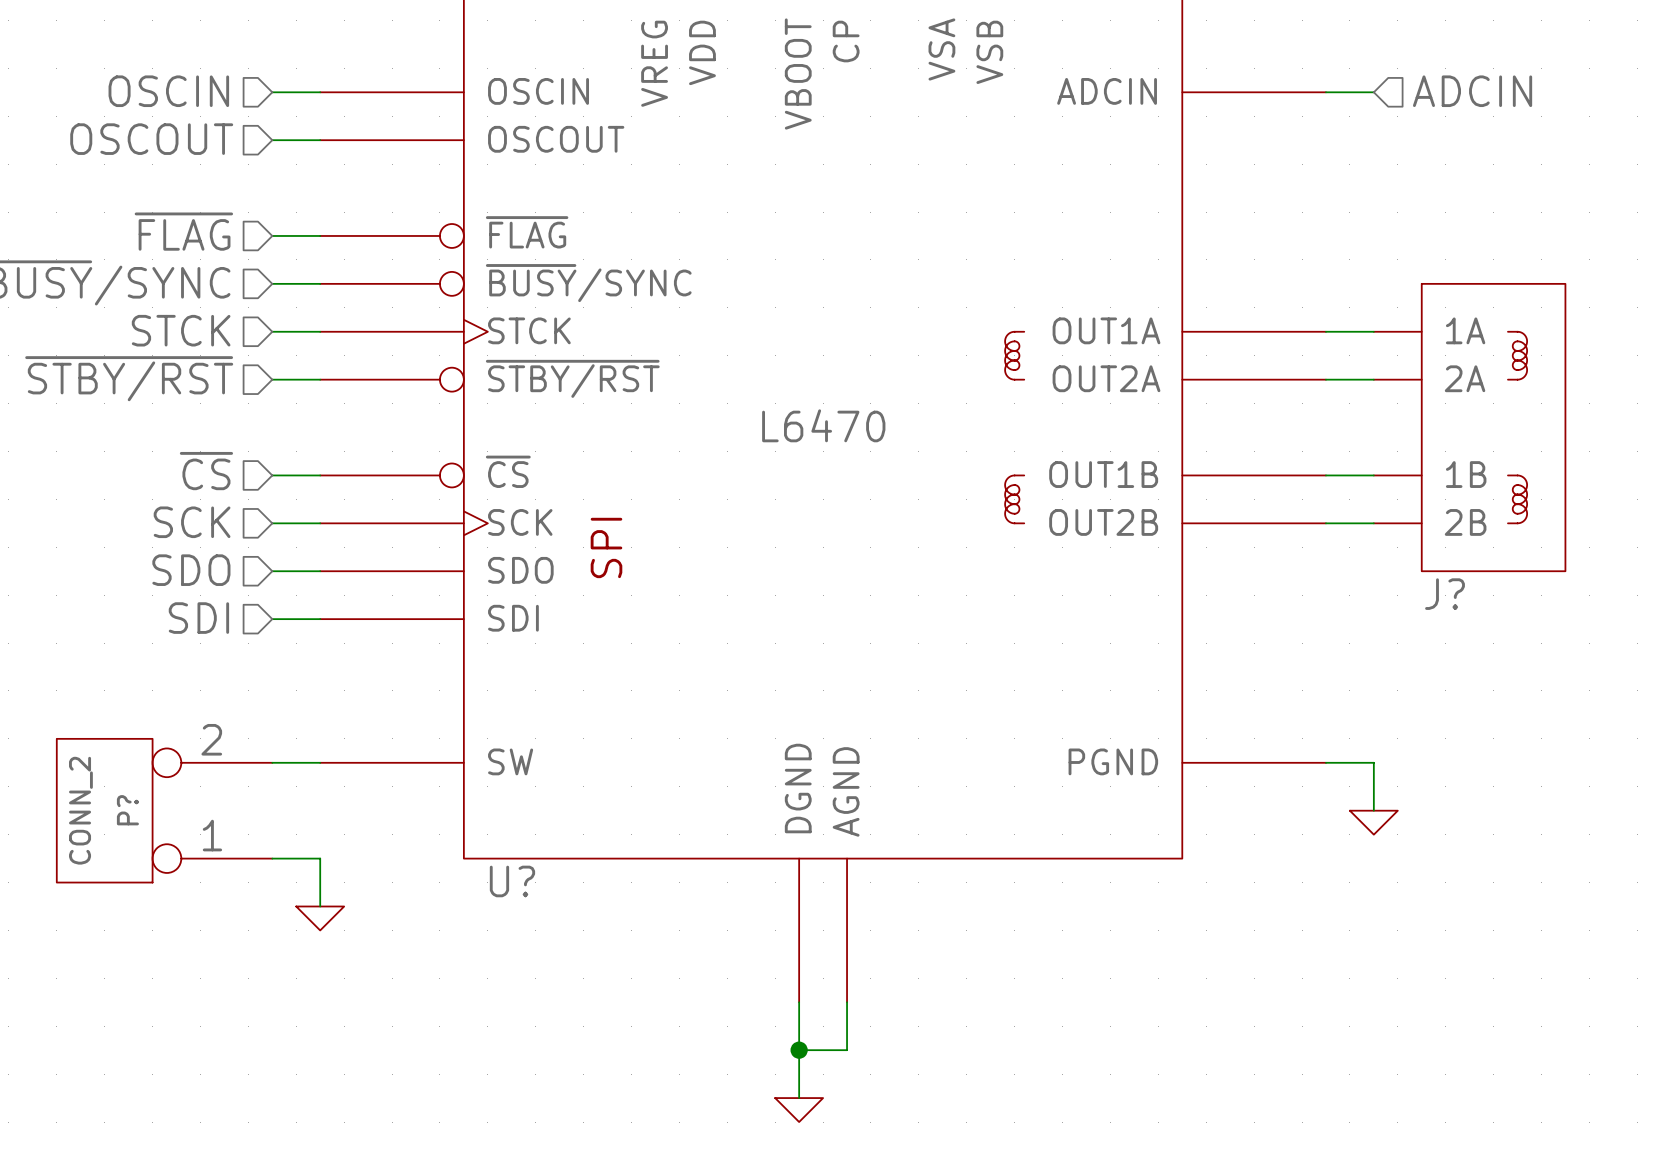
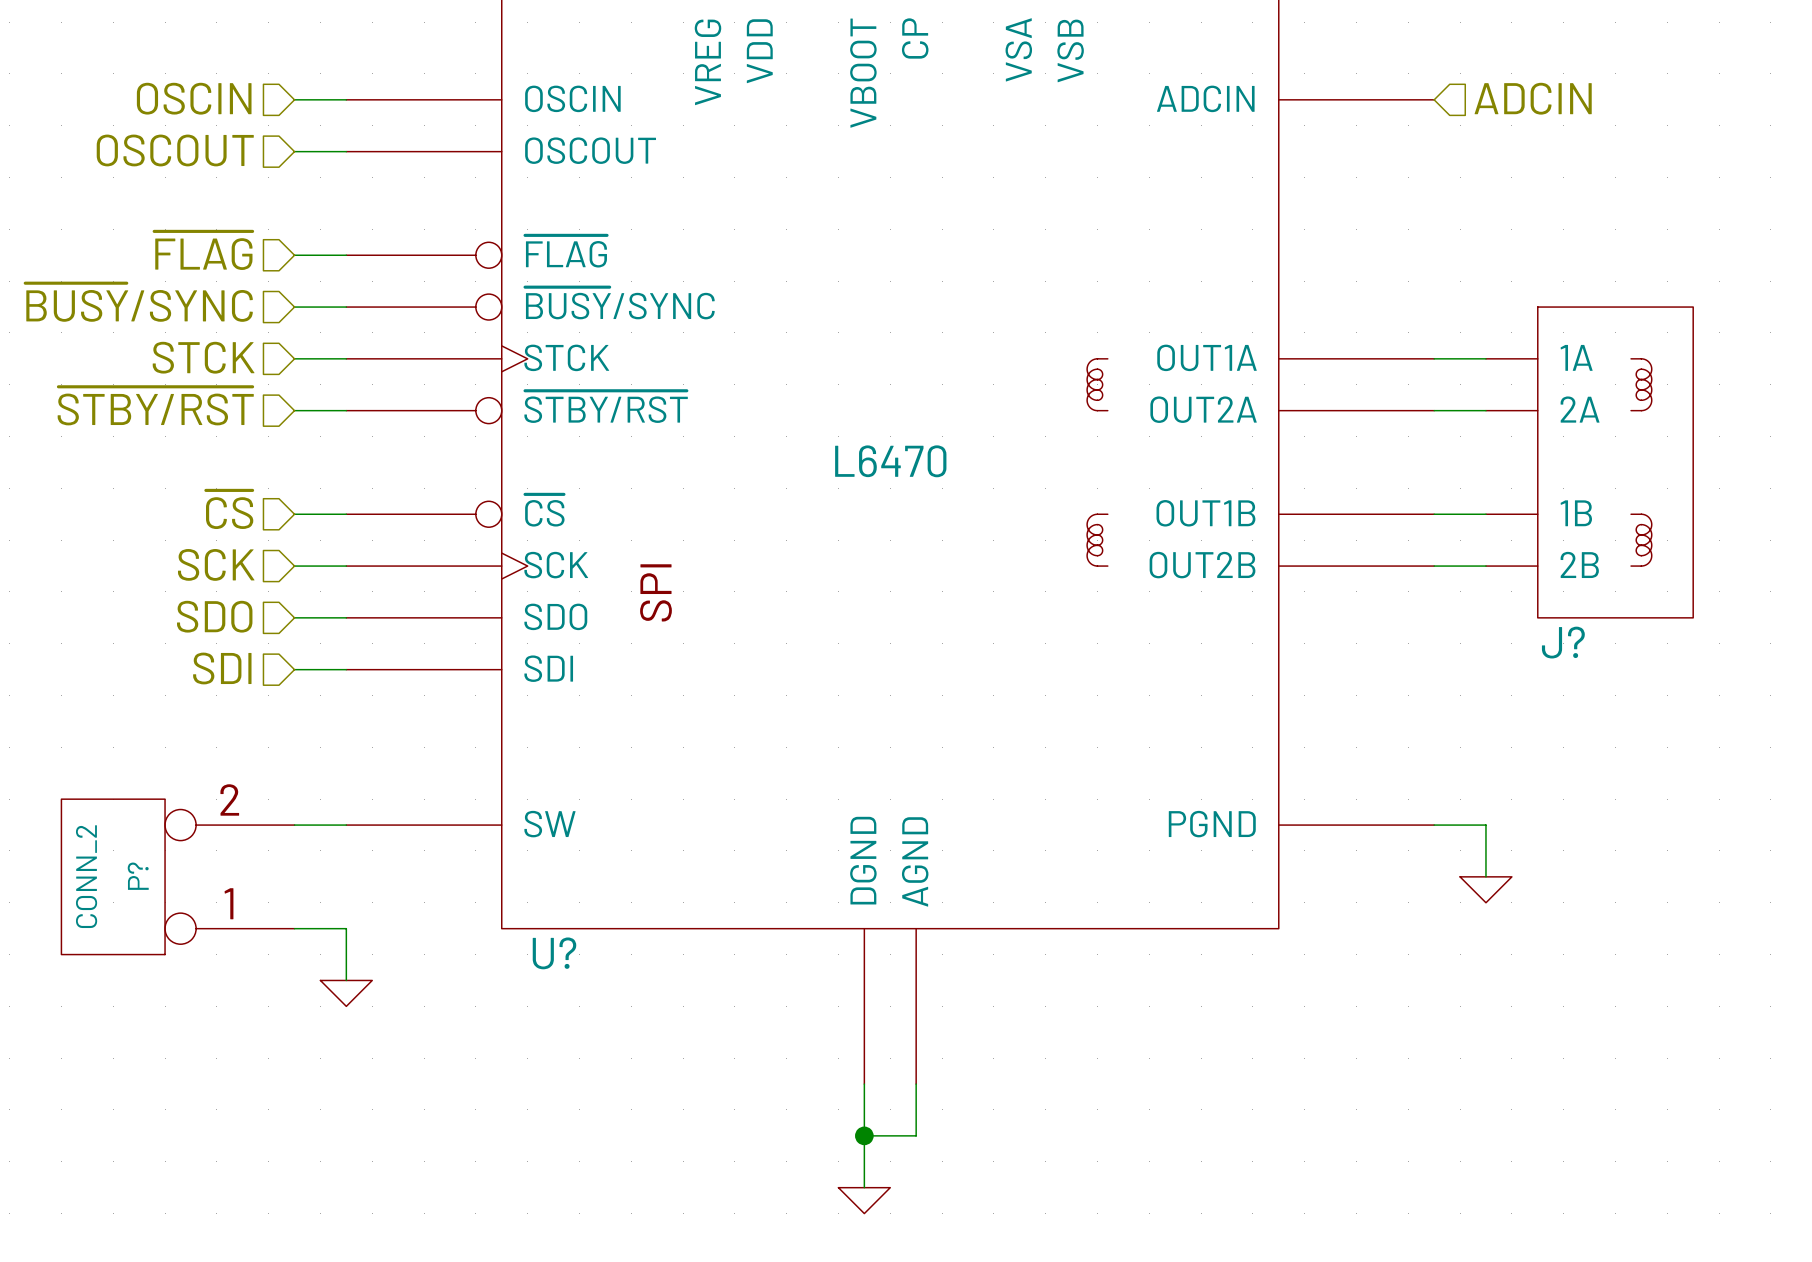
hierarchical label position: ADCIN (1472, 91) -> ADCIN (1533, 98)
wire: (1325, 92) (1373, 92) -> none

